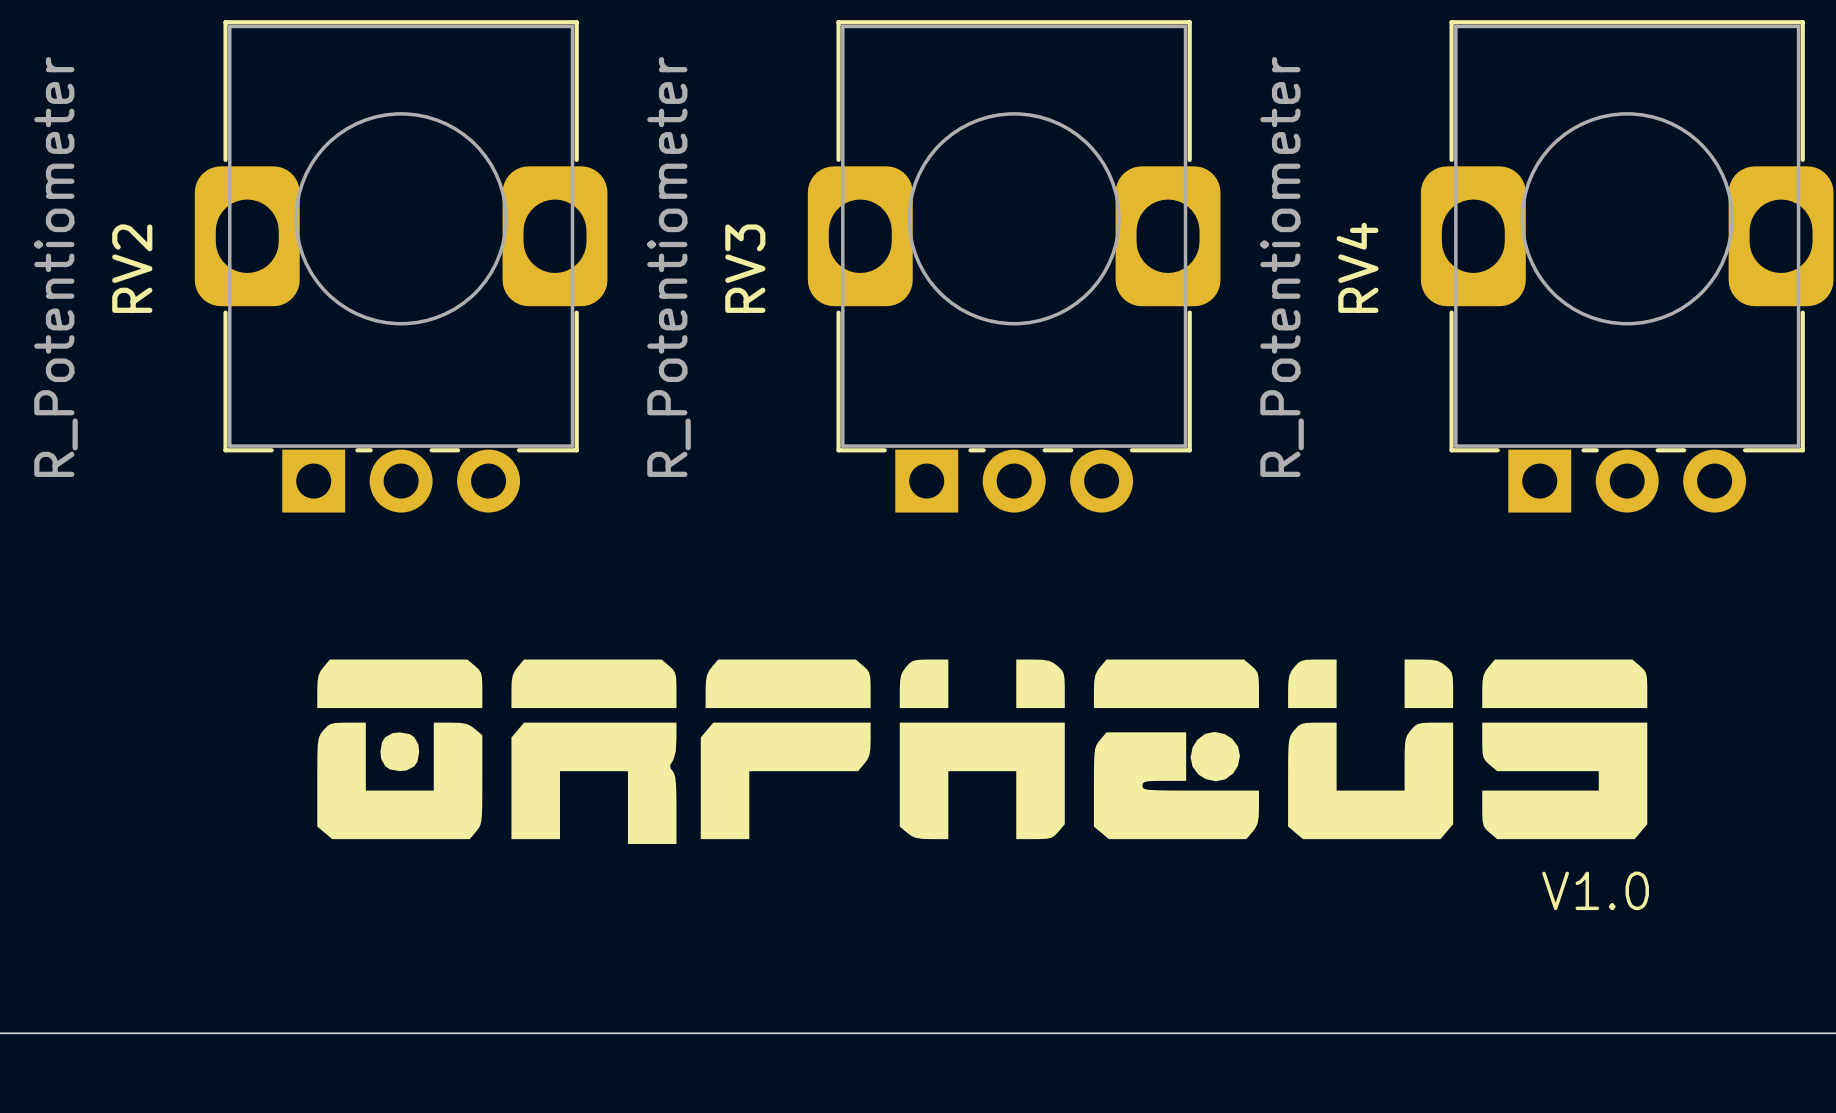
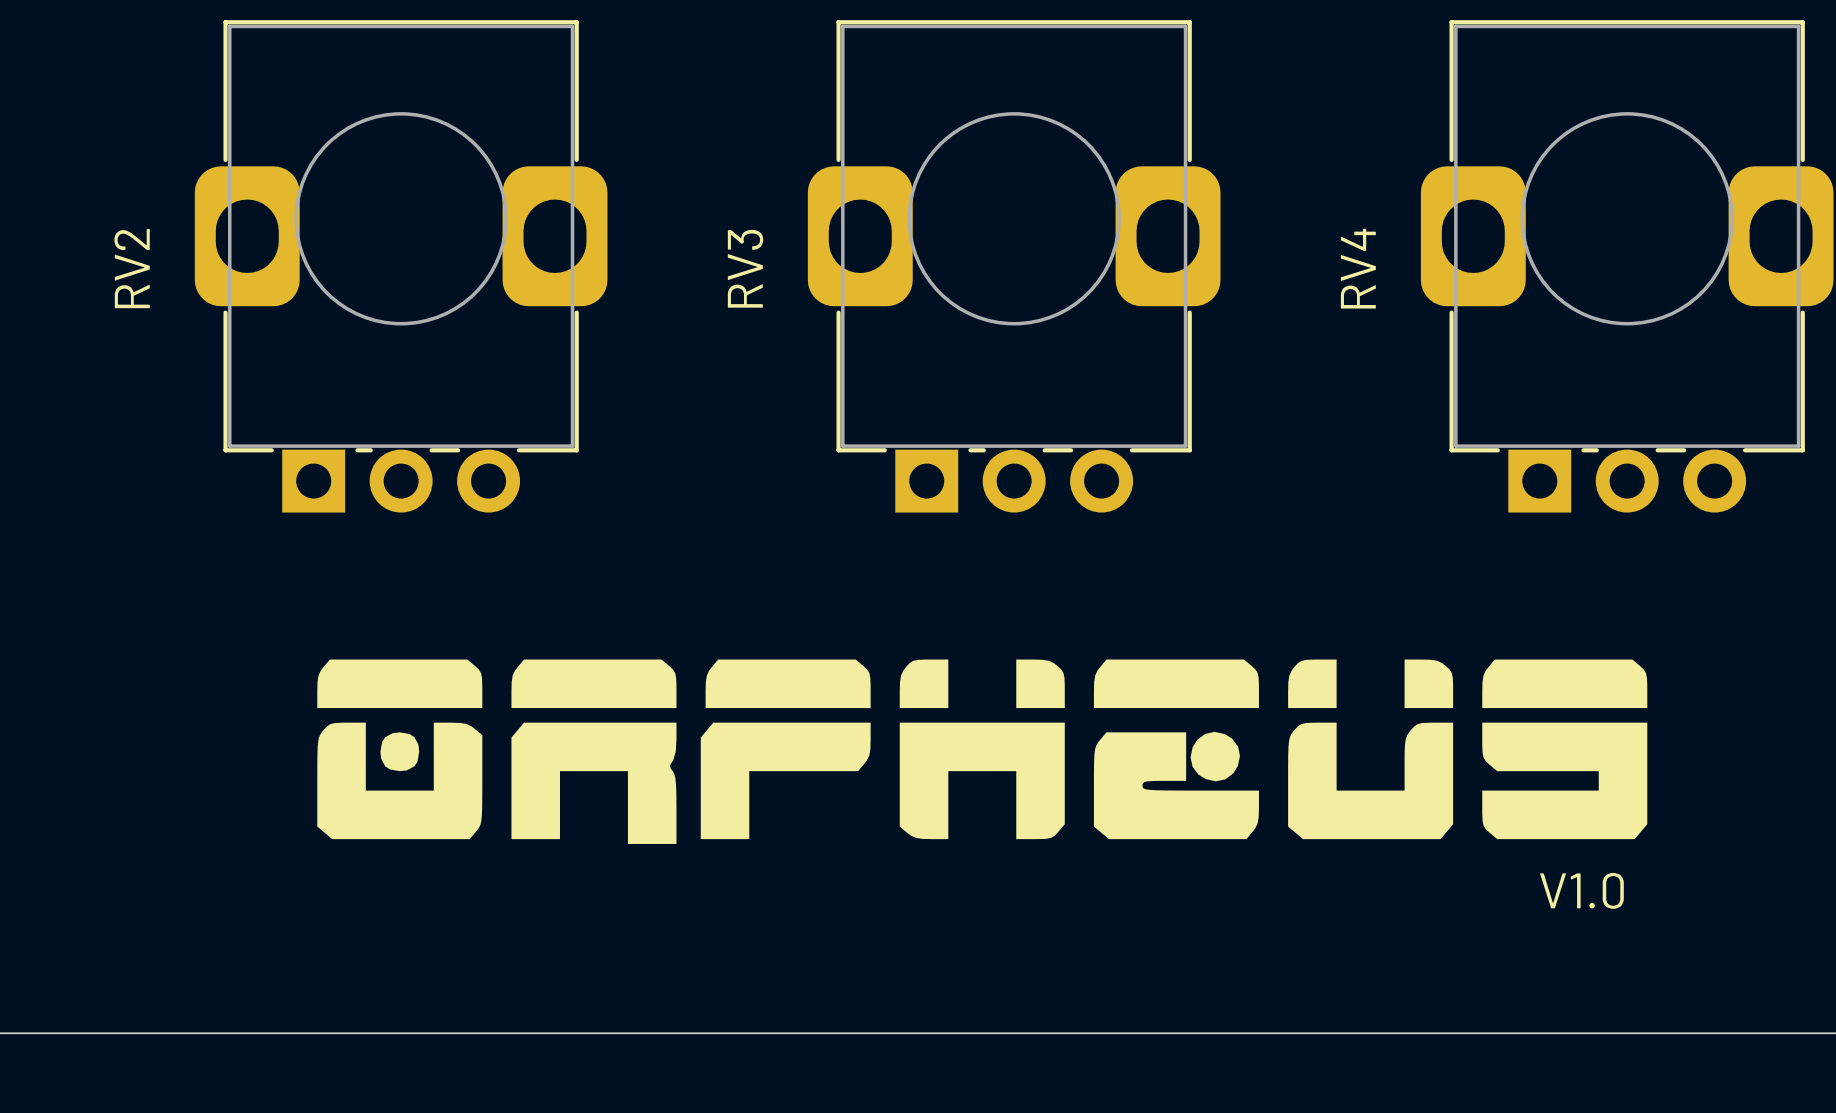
part value: R_Potentiometer (55, 266) -> none
RV2 value: R_Potentiometer (669, 266) -> none
RV3 value: R_Potentiometer (1282, 266) -> none

